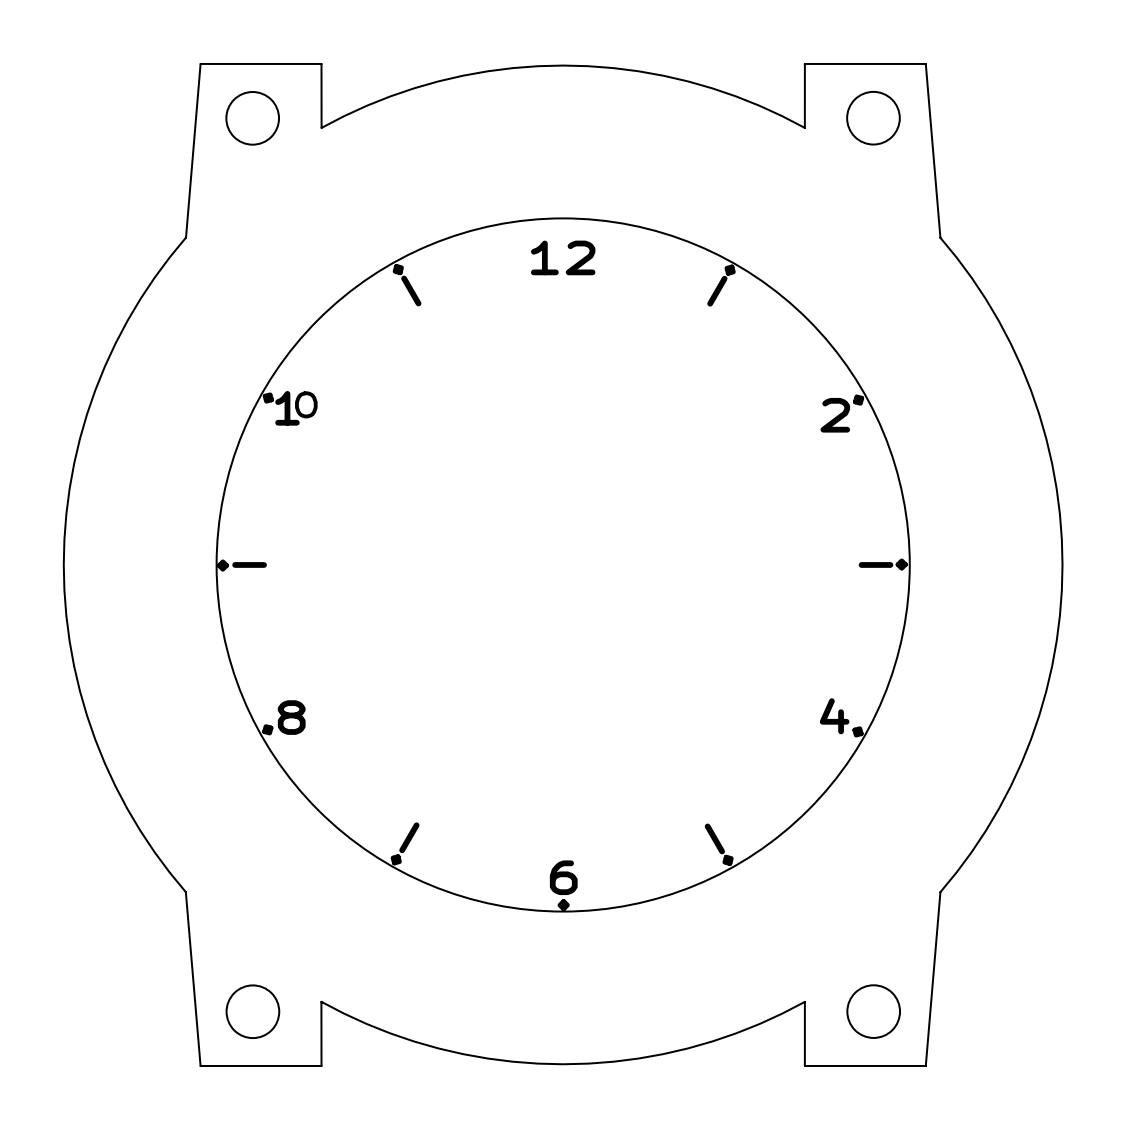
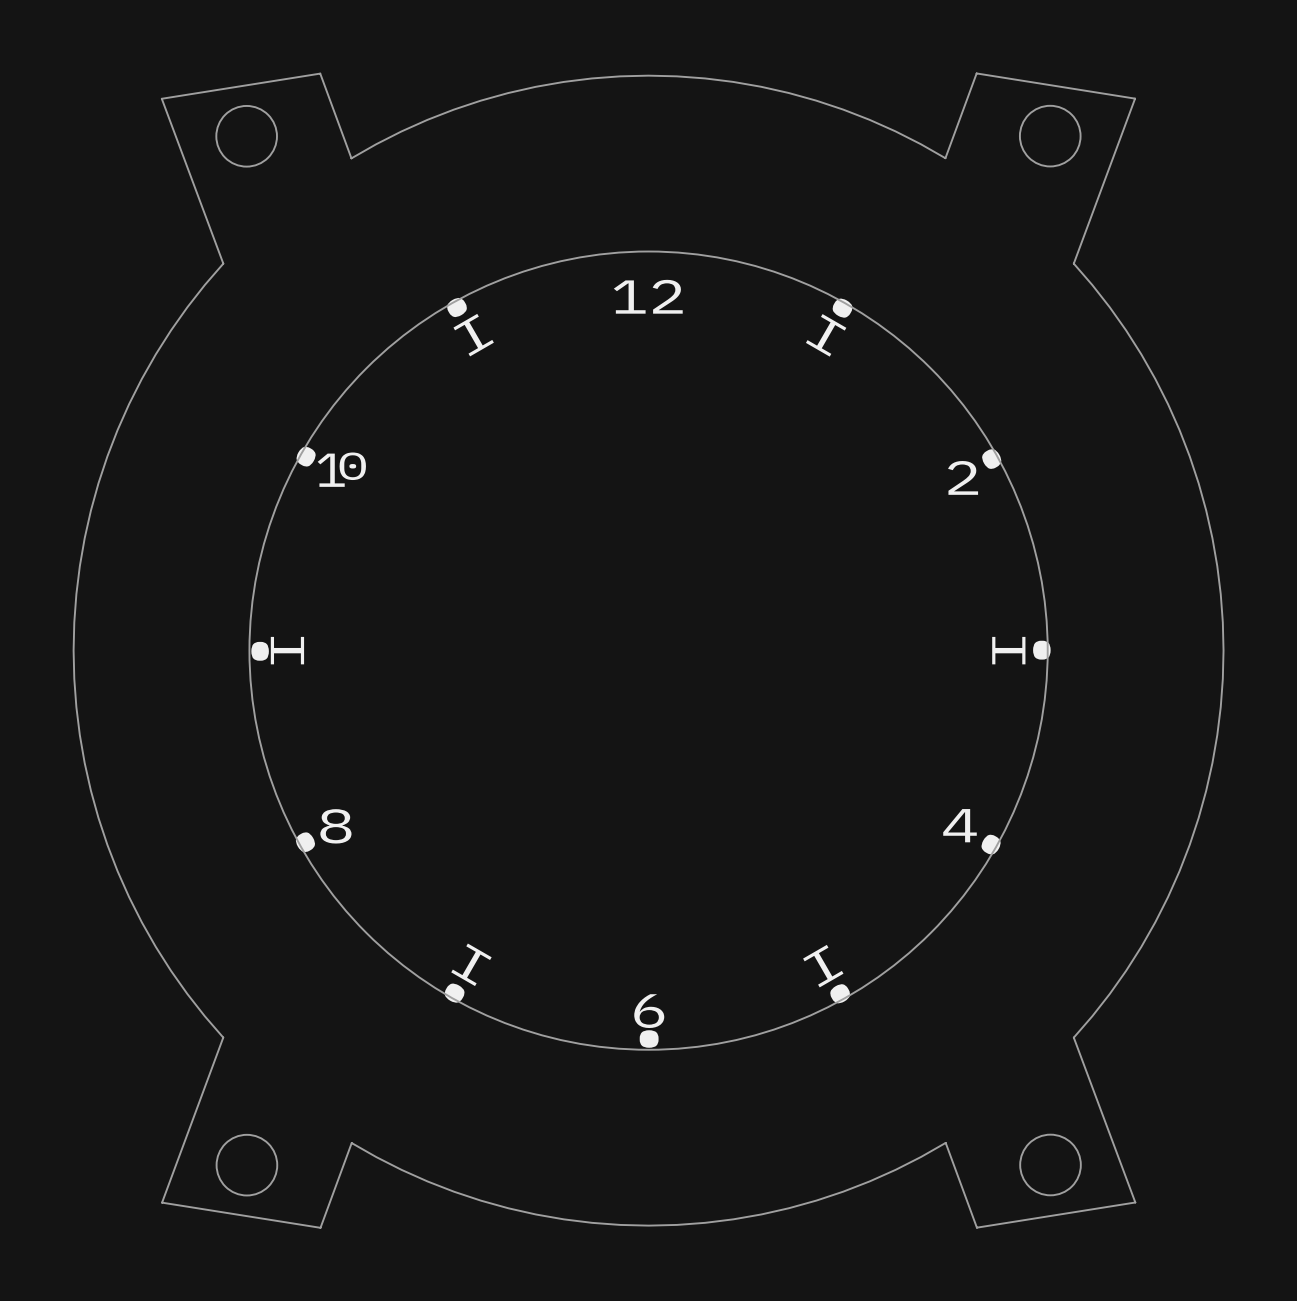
board edge: (200, 63) (321, 63) (321, 127) (366, 105) (438, 81) (487, 71) (563, 65) (613, 68) (688, 81) (759, 105) (804, 127) (804, 63) (925, 63) (940, 237) (985, 299) (1010, 343) (1031, 390) (1046, 438) (1056, 488) (1062, 564) (1056, 641) (1046, 691) (1031, 739) (998, 808) (971, 851) (940, 892) (925, 1065) (804, 1065) (804, 1001) (759, 1024) (687, 1048) (638, 1058) (563, 1064) (512, 1061) (438, 1048) (366, 1023) (321, 1001) (321, 1065) (200, 1065) (185, 892) (154, 851) (127, 808) (95, 739) (74, 666) (66, 615) (63, 564) (66, 513) (74, 463) (95, 390) (115, 343) (140, 298) (186, 237) (200, 63) -> (976, 73) (945, 158) (869, 119) (816, 100) (761, 86) (705, 78) (620, 76) (563, 81) (508, 93) (427, 119) (351, 158) (320, 73) (161, 98) (223, 263) (187, 307) (155, 354) (129, 404) (107, 456) (84, 538) (76, 594) (73, 650) (79, 735) (90, 790) (107, 844) (129, 897) (155, 946) (187, 993) (223, 1037) (162, 1202) (320, 1227) (351, 1143) (427, 1181) (508, 1208) (563, 1219) (620, 1224) (705, 1222) (761, 1214) (816, 1200) (869, 1181) (945, 1142) (976, 1227) (1135, 1202) (1073, 1037) (1109, 993) (1141, 946) (1179, 871) (1198, 817) (1217, 735) (1222, 678) (1222, 622) (1217, 566) (1198, 483) (1168, 404) (1126, 330) (1073, 263) (1135, 98) (976, 73)
round board edge position: (252, 118) -> (246, 136)
round board edge position: (873, 118) -> (1050, 136)
round board edge position: (252, 1011) -> (246, 1165)
round board edge position: (873, 1011) -> (1050, 1164)

